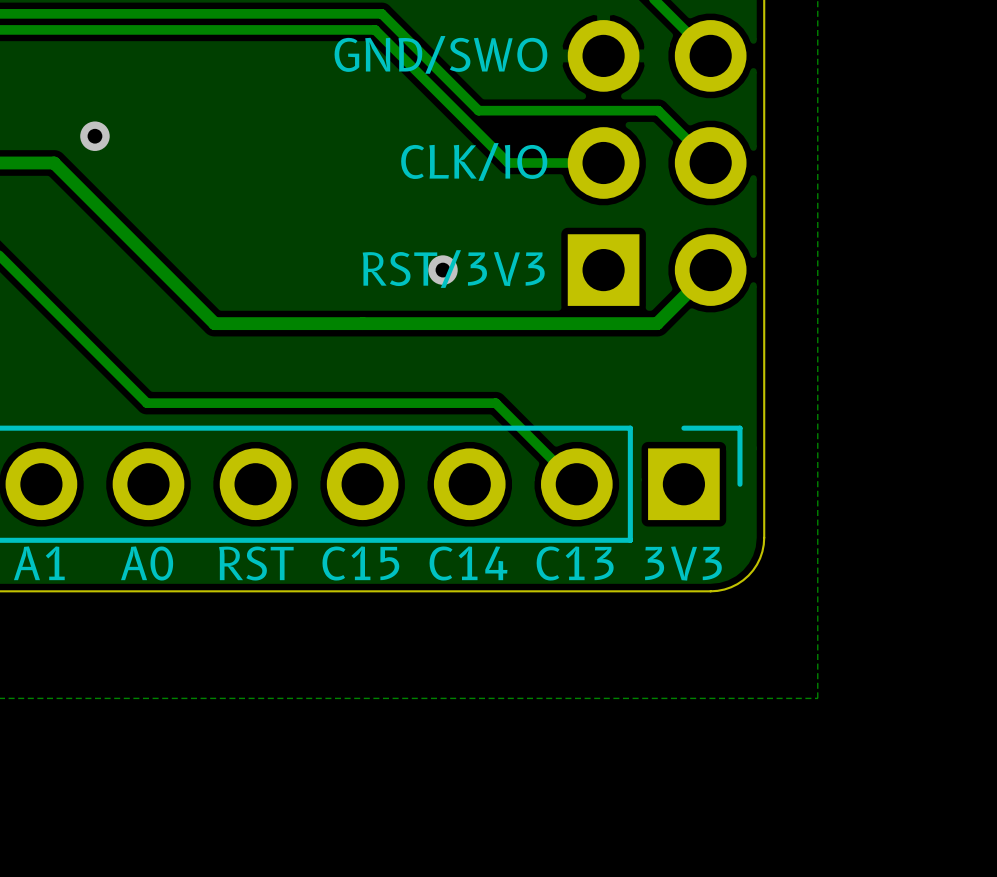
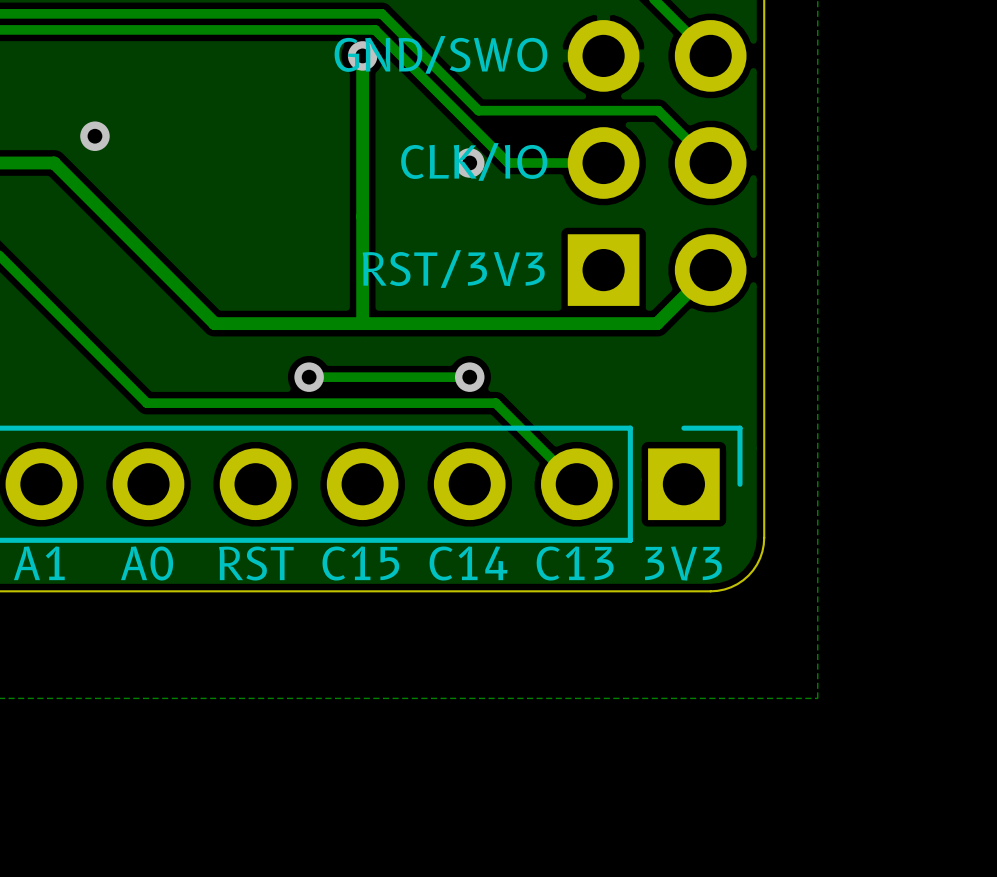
track: none -> (362, 55) (362, 323)
via: none -> (362, 55)
via: none -> (469, 162)
via: (442, 270) -> none
via: none -> (309, 377)
track: none -> (469, 377) (309, 377)
via: none -> (469, 377)

